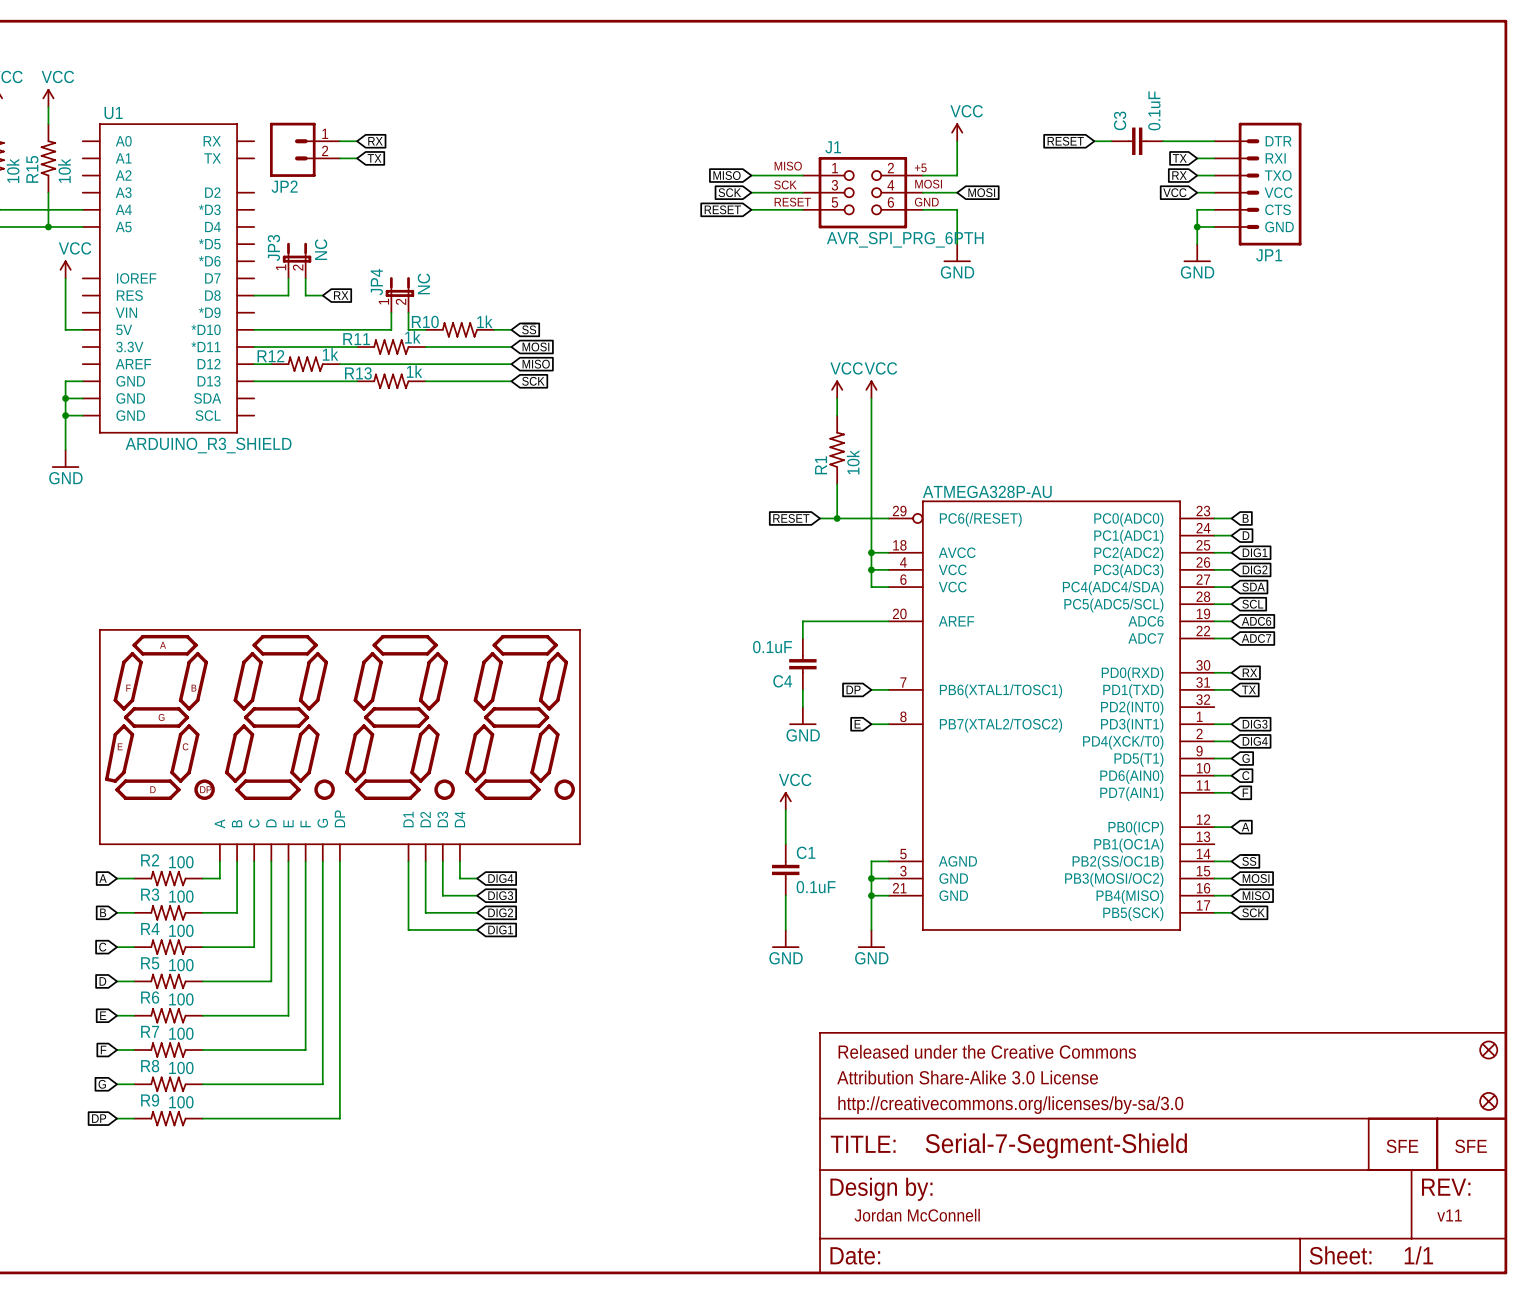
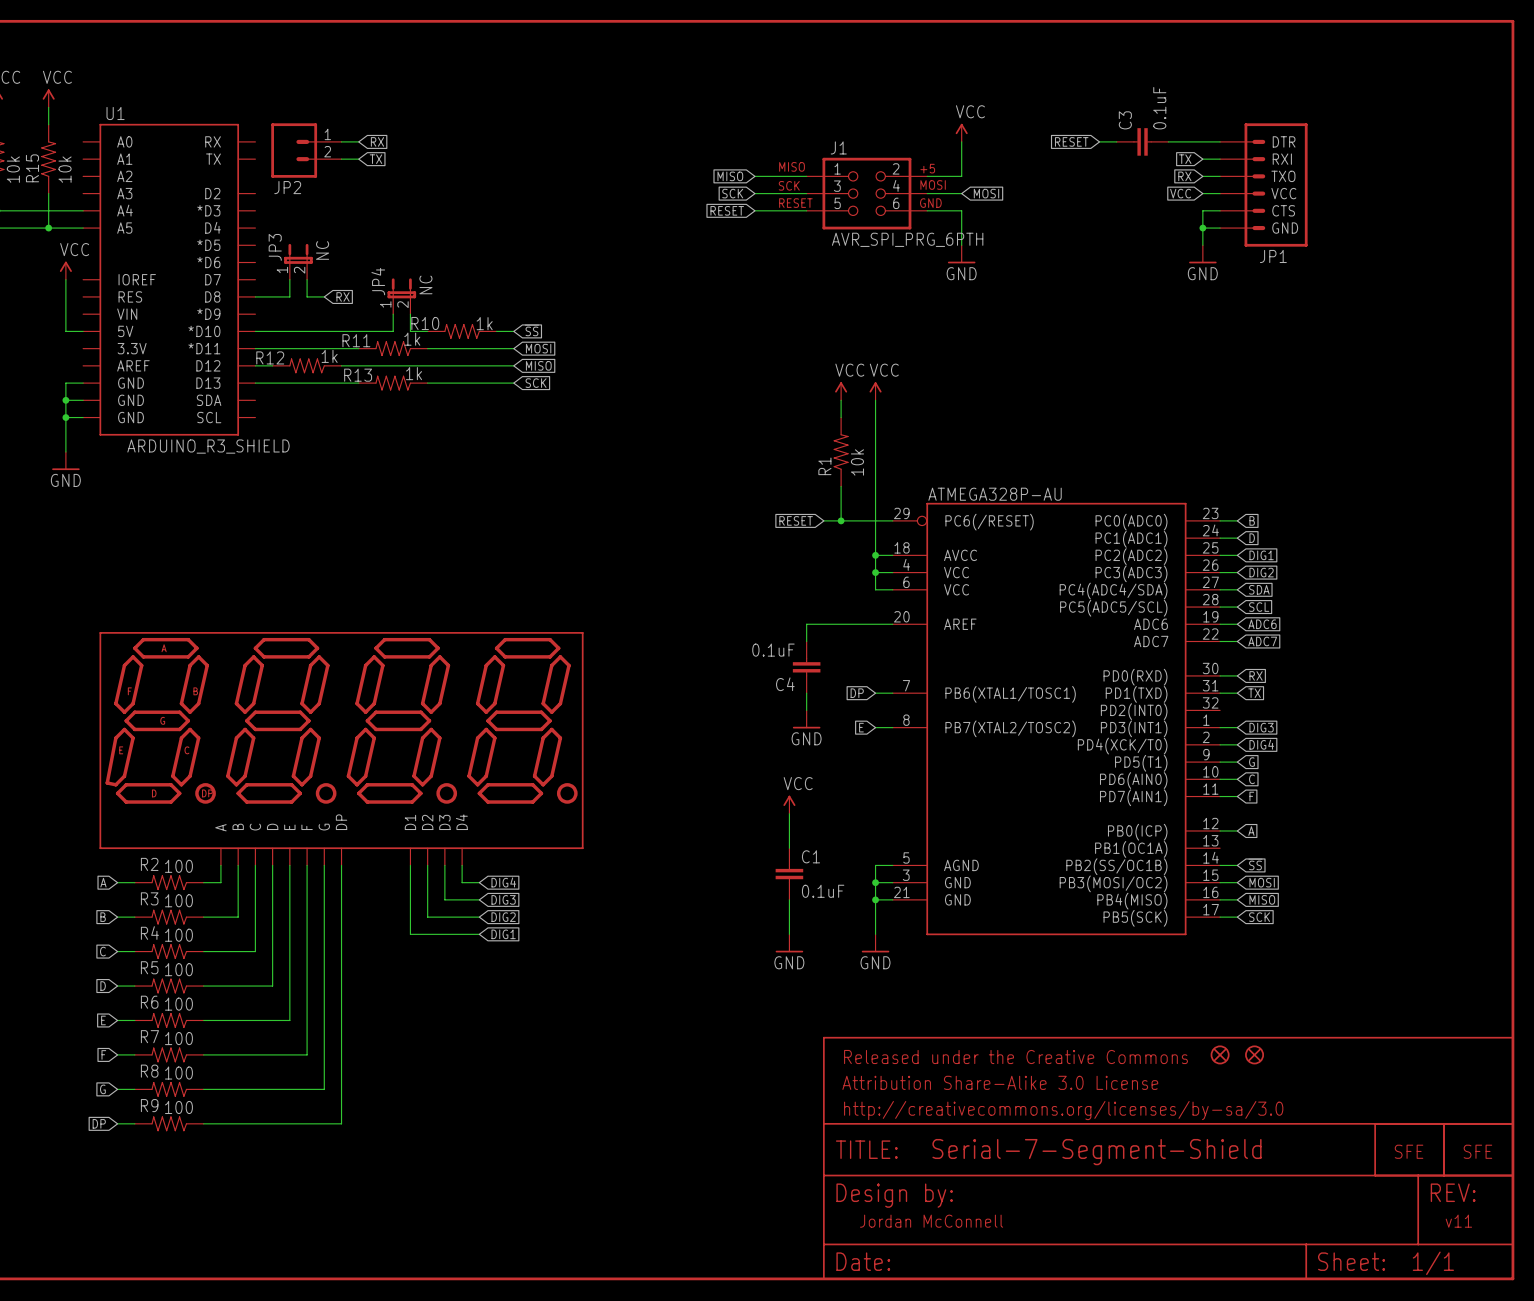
part: none -> (1220, 1054)
part: none -> (1254, 1054)
part: (1488, 1050) -> none
part: (1488, 1101) -> none

